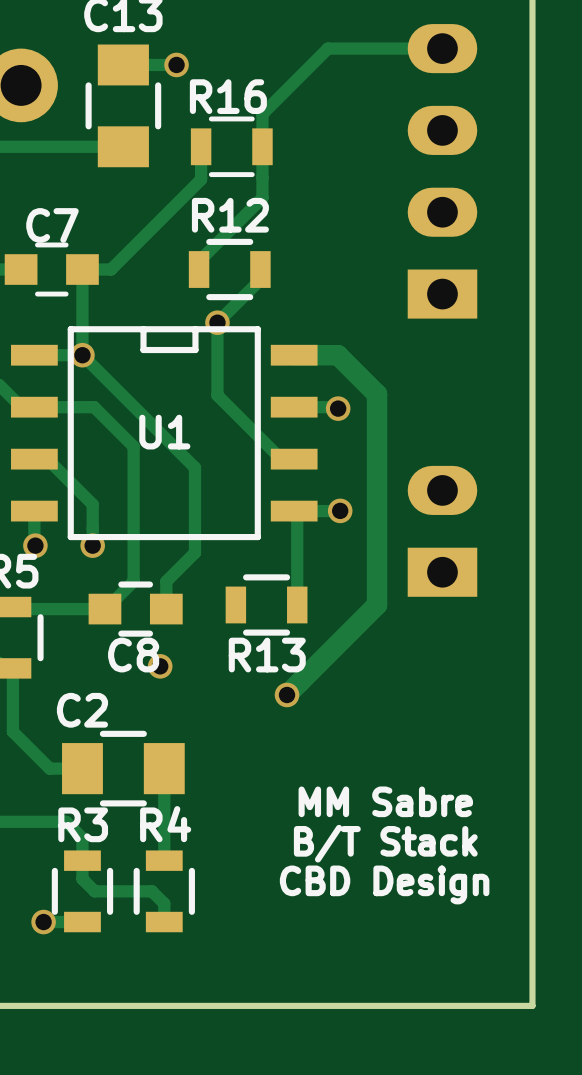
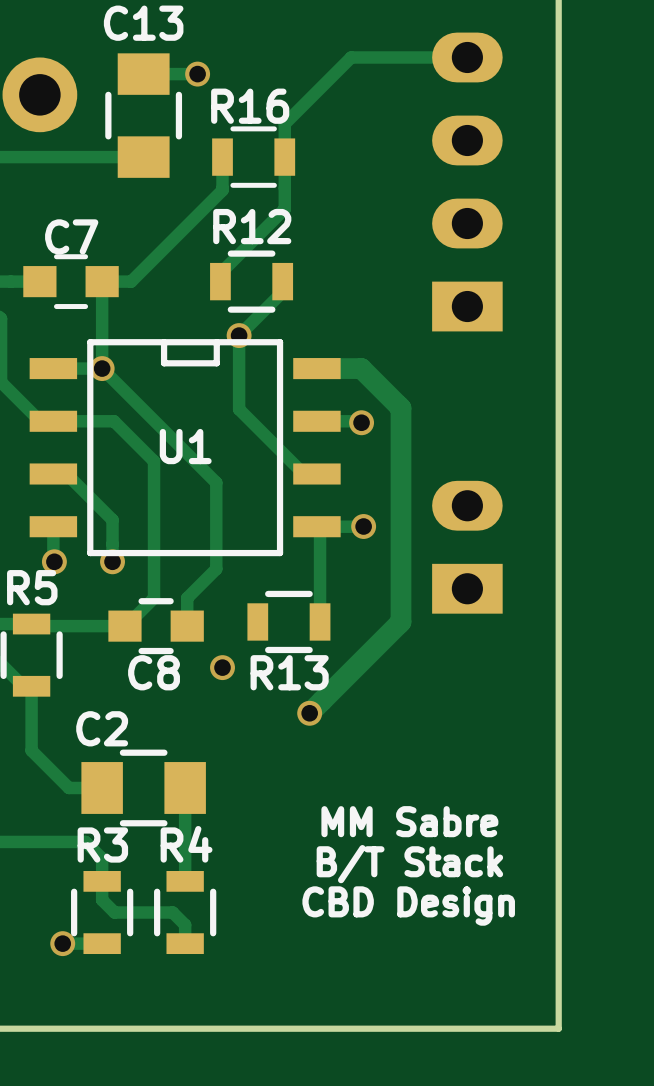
via position: (160, 666) -> (222, 667)

